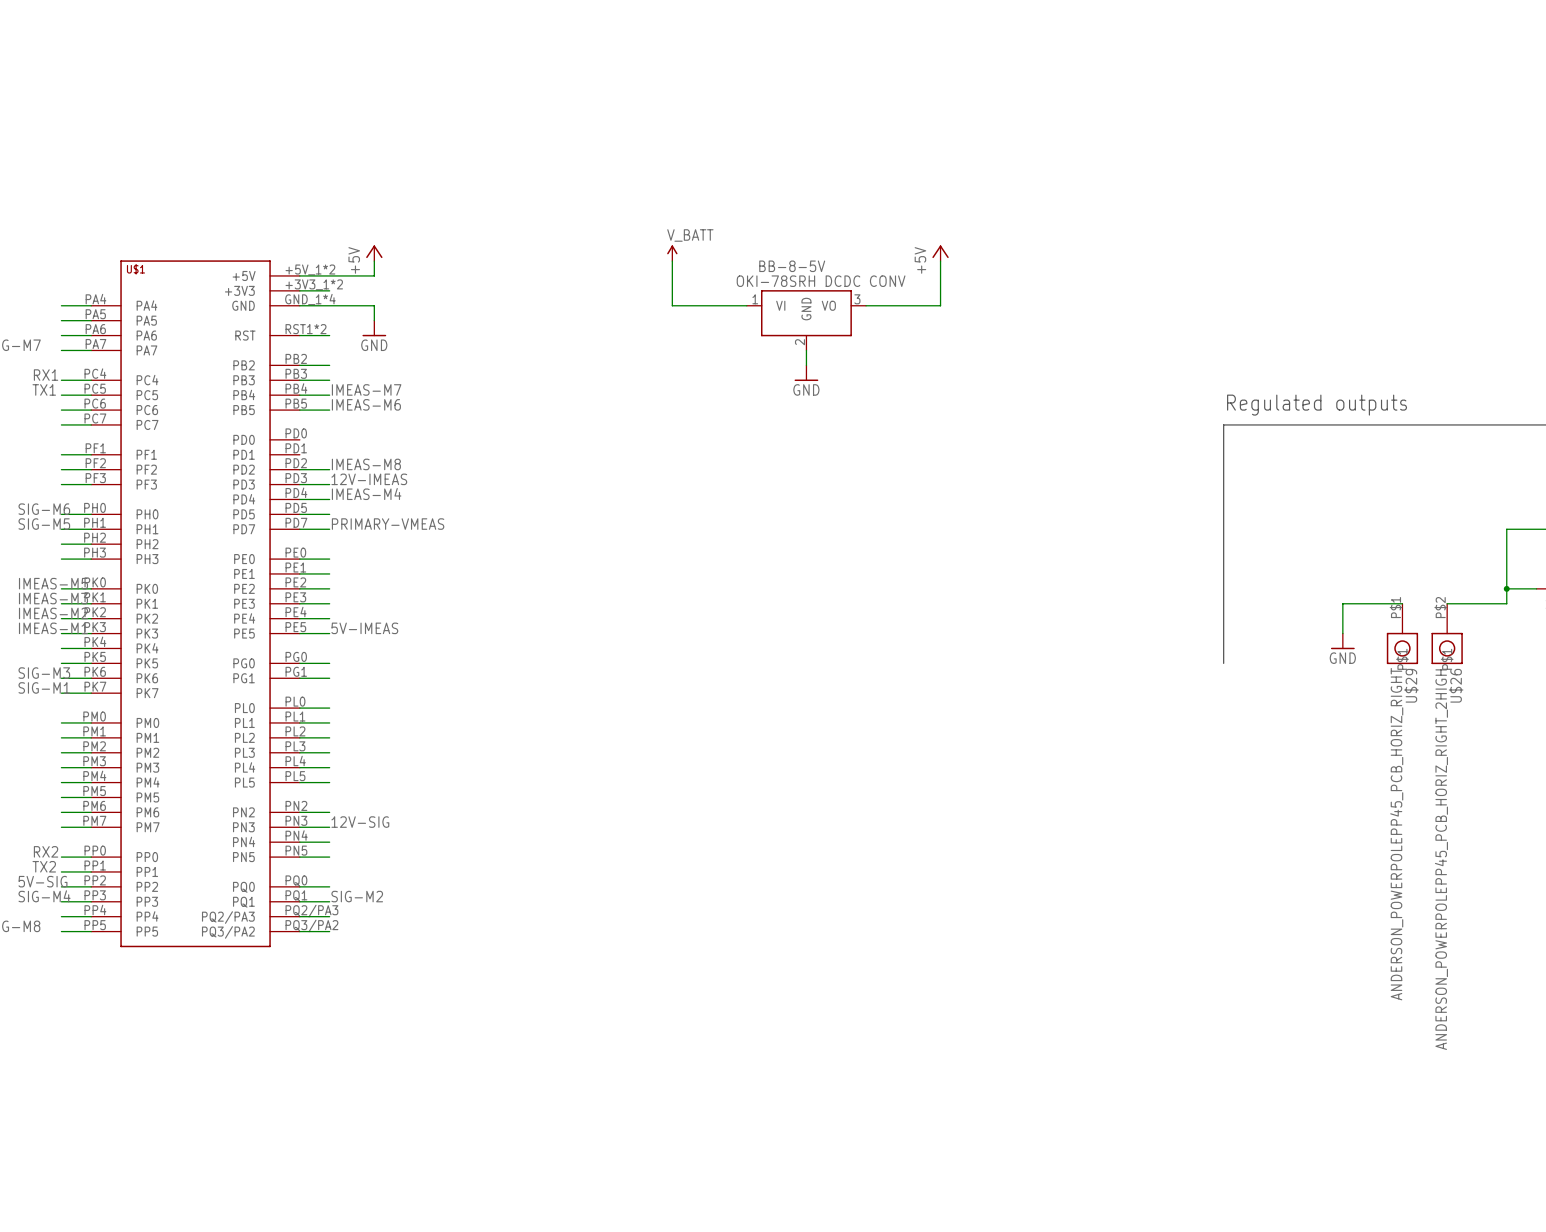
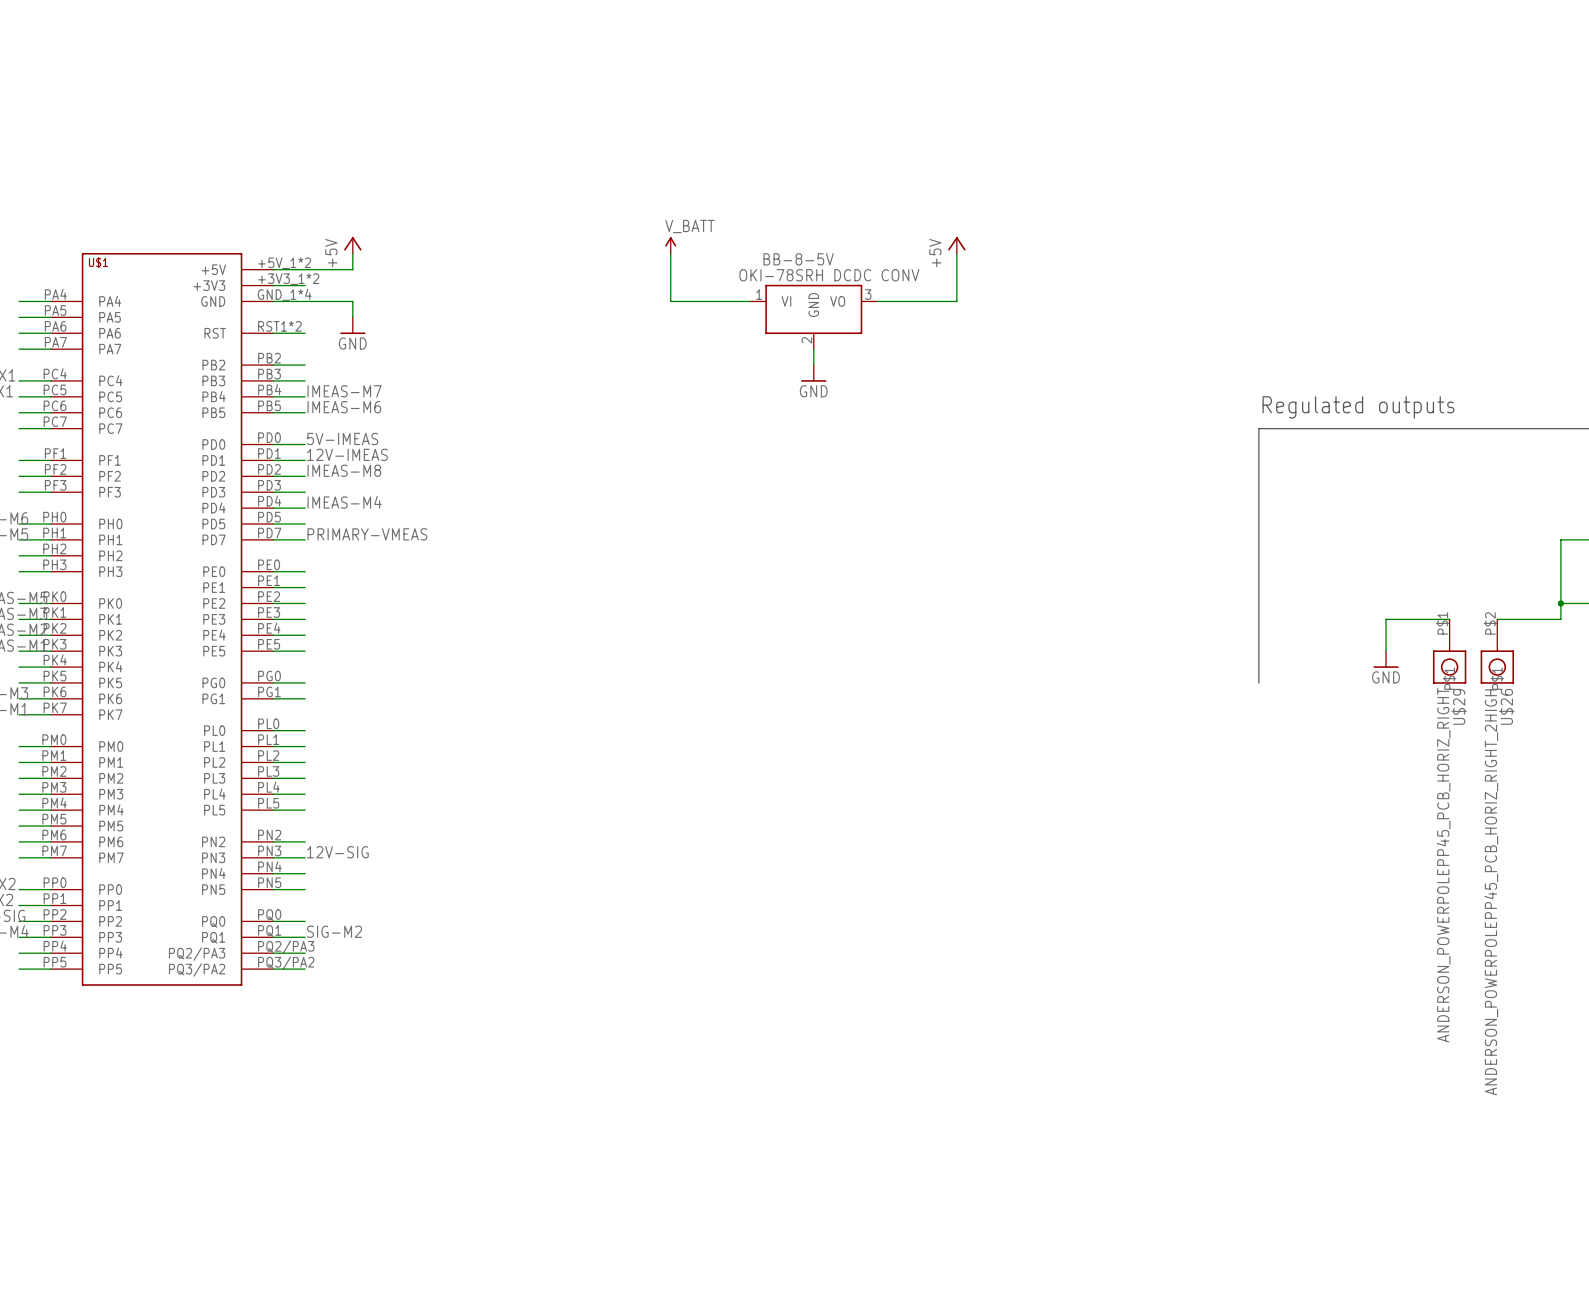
label: none -> 5V-IMEAS (342, 438)
wire: none -> (273, 444) (305, 444)
wire: none -> (273, 460) (305, 460)
label position: 12V-IMEAS (369, 479) -> 12V-IMEAS (347, 454)
label: 5V-IMEAS (364, 628) -> none

